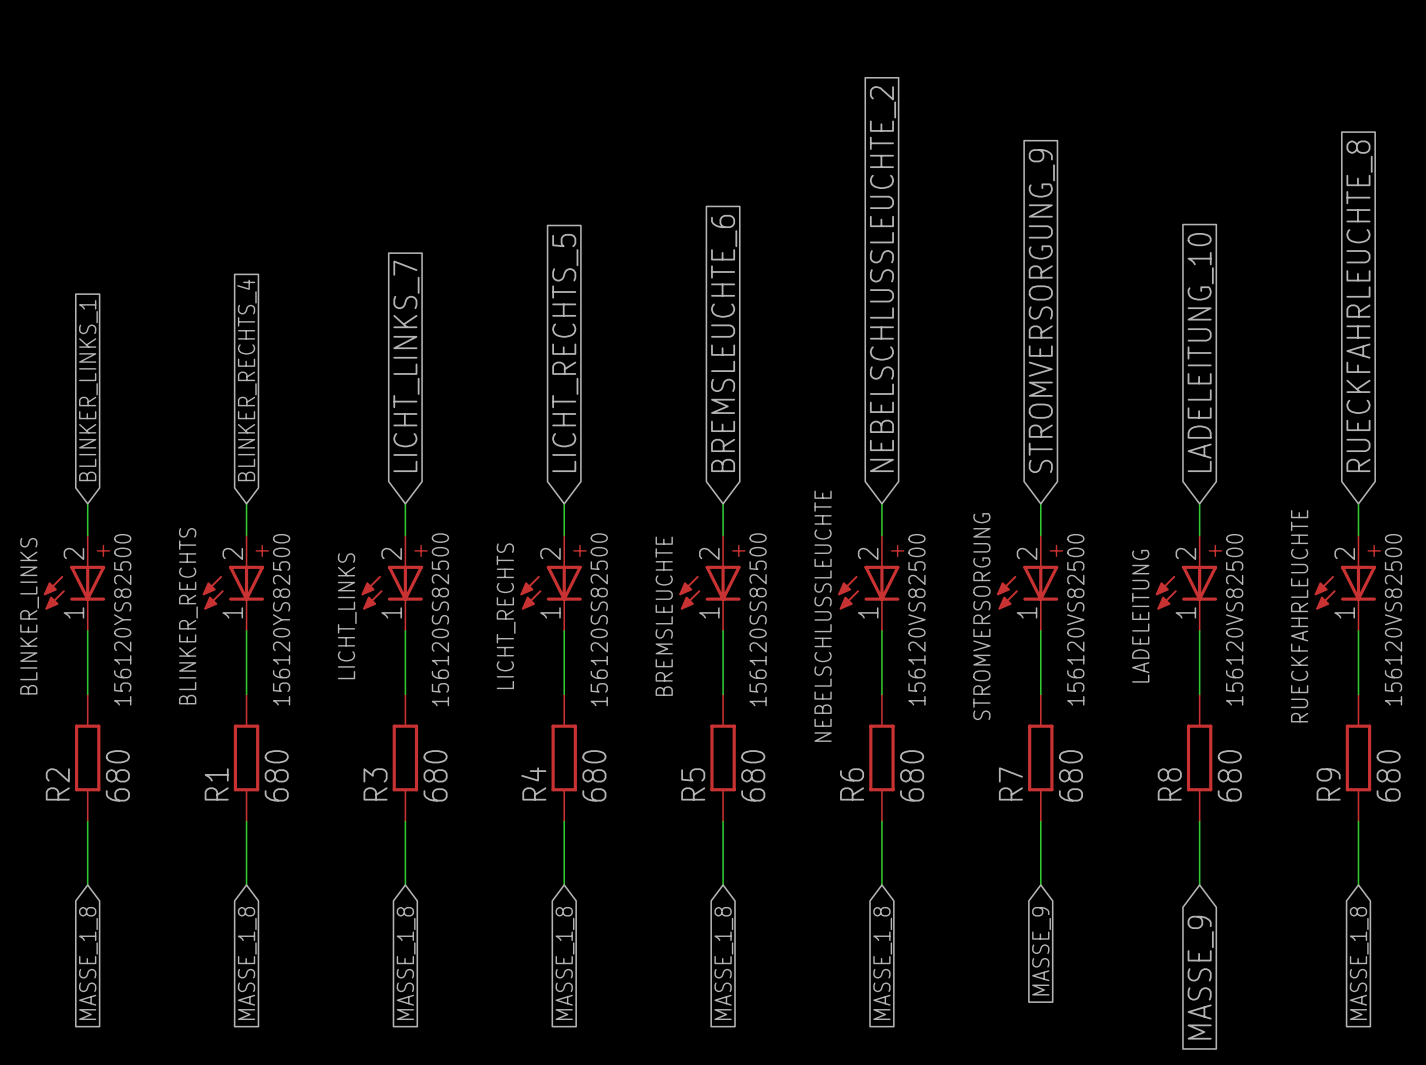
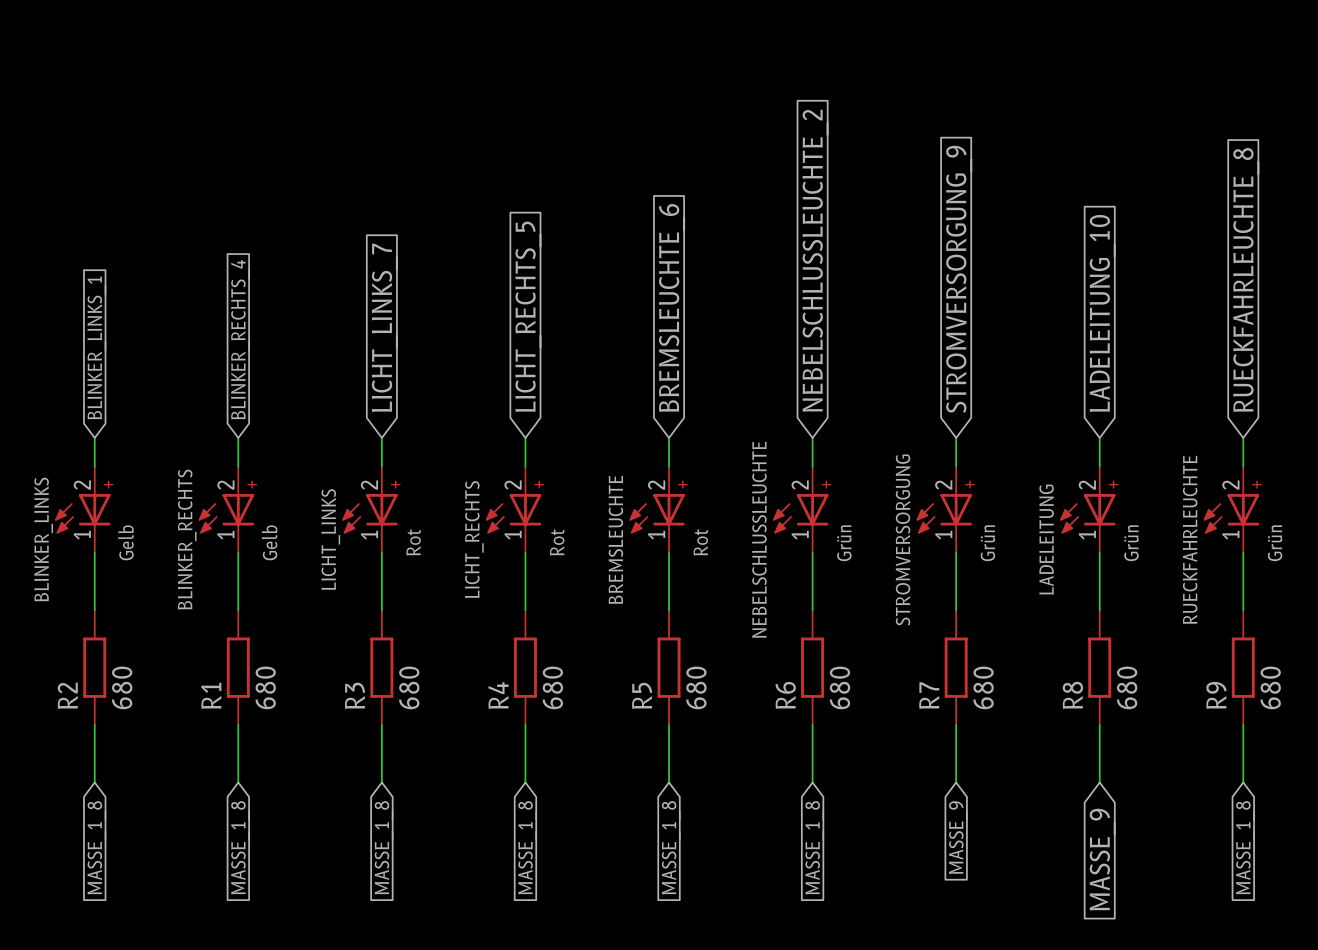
BLINKER_LINKS value: 156120YS82500 (122, 619) -> Gelb (126, 542)
BLINKER_RECHTS value: 156120YS82500 (281, 619) -> Gelb (269, 542)
LICHT_LINKS value: 156120SS82500 (440, 619) -> Rot (413, 542)
LICHT_RECHTS value: 156120SS82500 (599, 619) -> Rot (557, 542)
BREMSLEUCHTE value: 156120SS82500 (758, 619) -> Rot (700, 542)
NEBELSCHLUSSLEUCHTE value: 156120VS82500 (916, 619) -> Grün (844, 543)
STROMVERSORGUNG value: 156120VS82500 (1075, 619) -> Grün (987, 543)
LADELEITUNG value: 156120VS82500 (1234, 619) -> Grün (1131, 543)
RUECKFAHRLEUCHTE value: 156120VS82500 (1393, 619) -> Grün (1275, 543)

